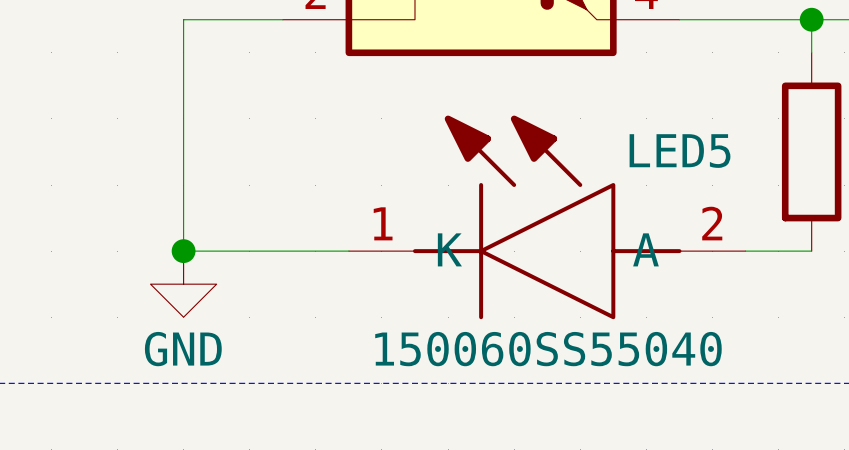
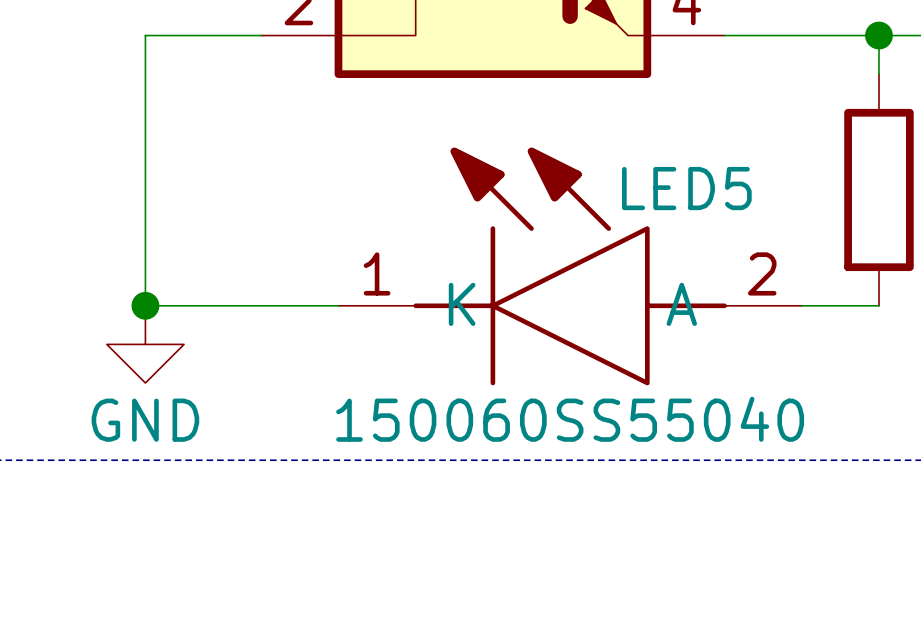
LED5 name position: LED5 (680, 151) -> LED5 (686, 188)

